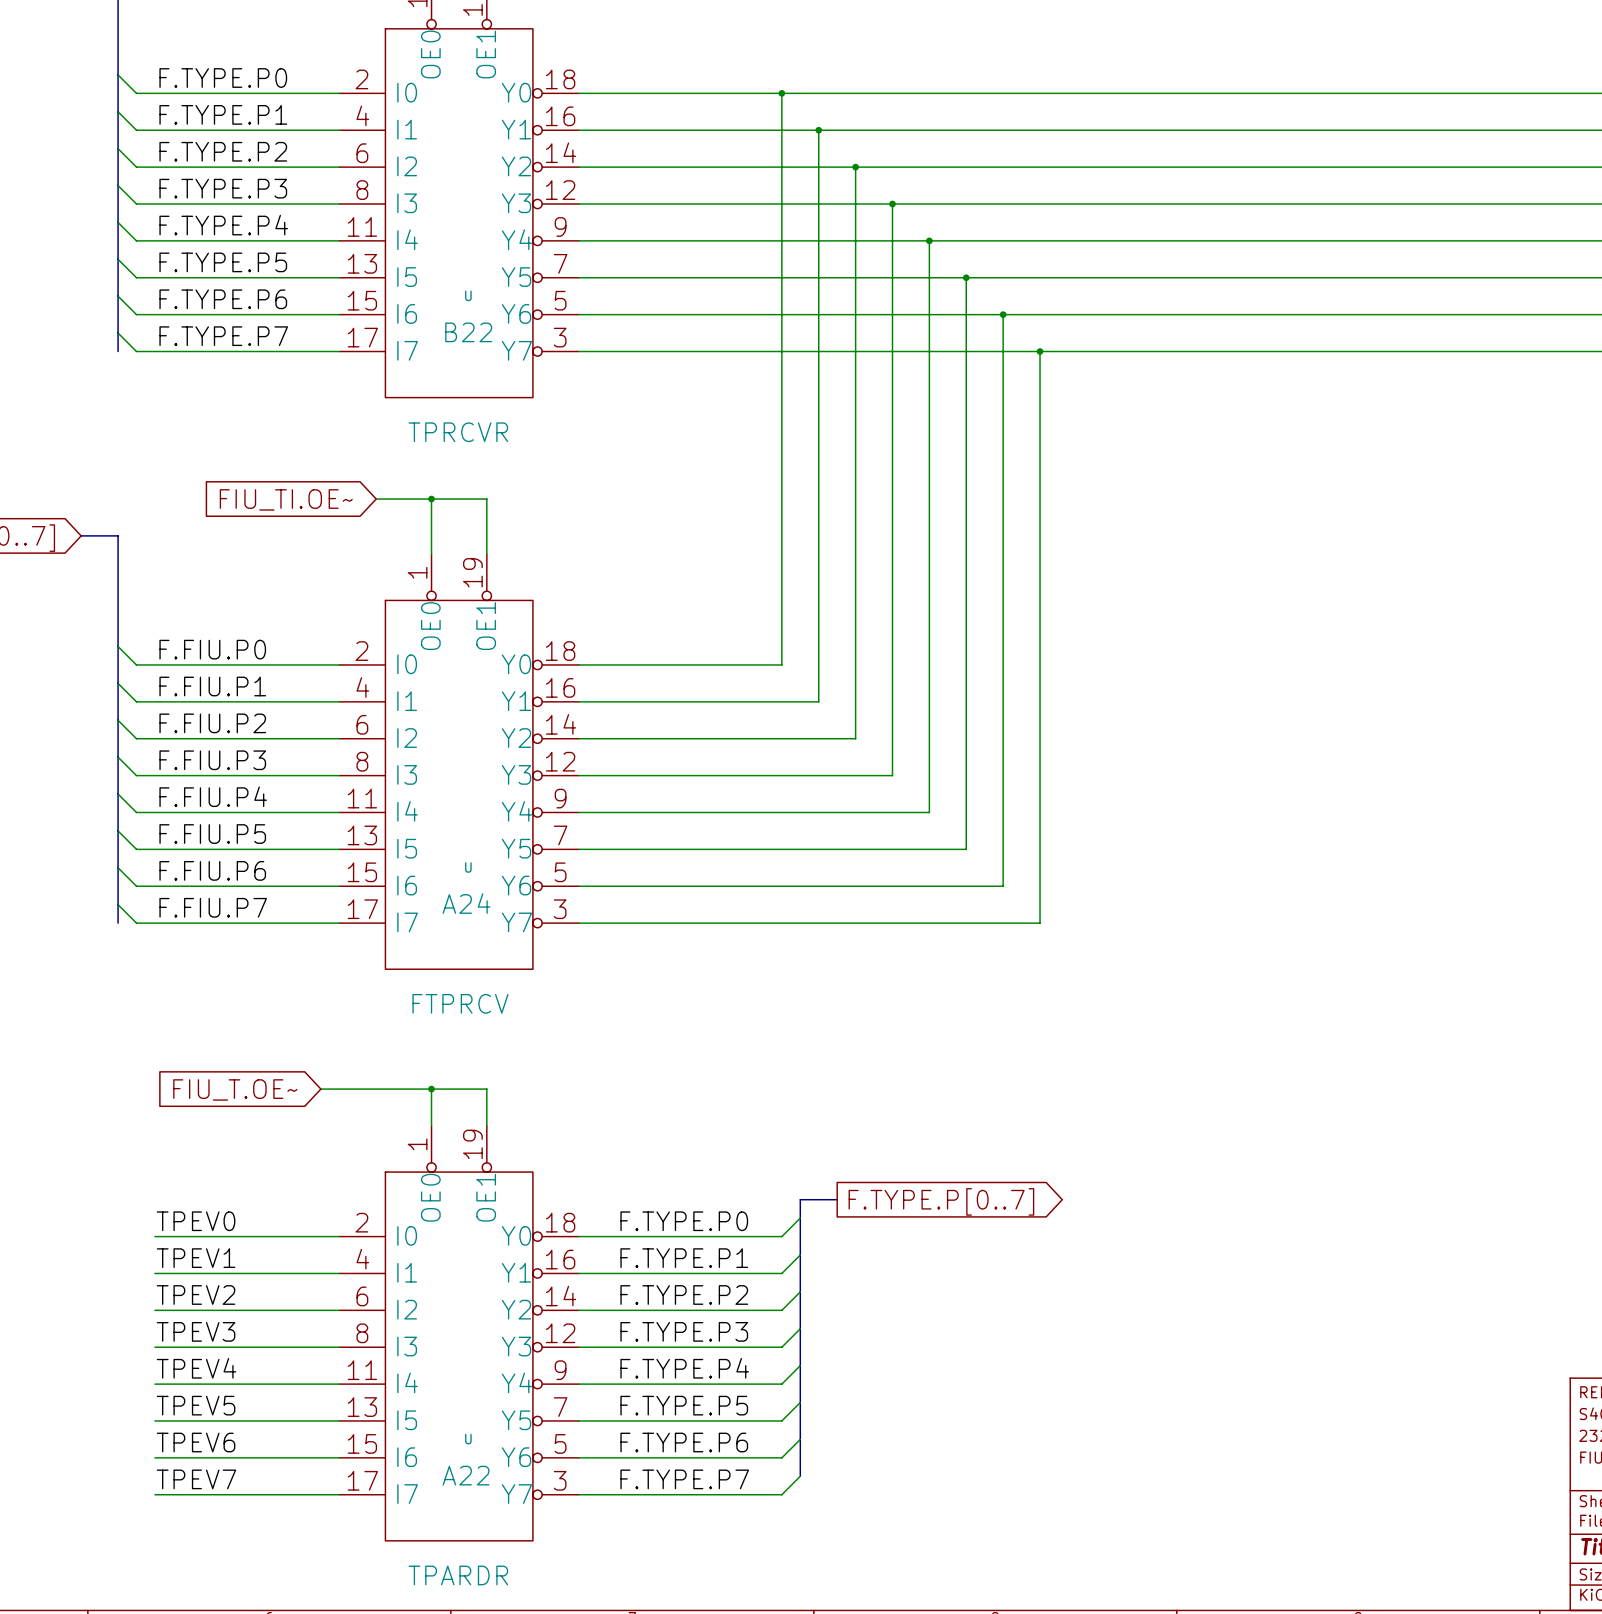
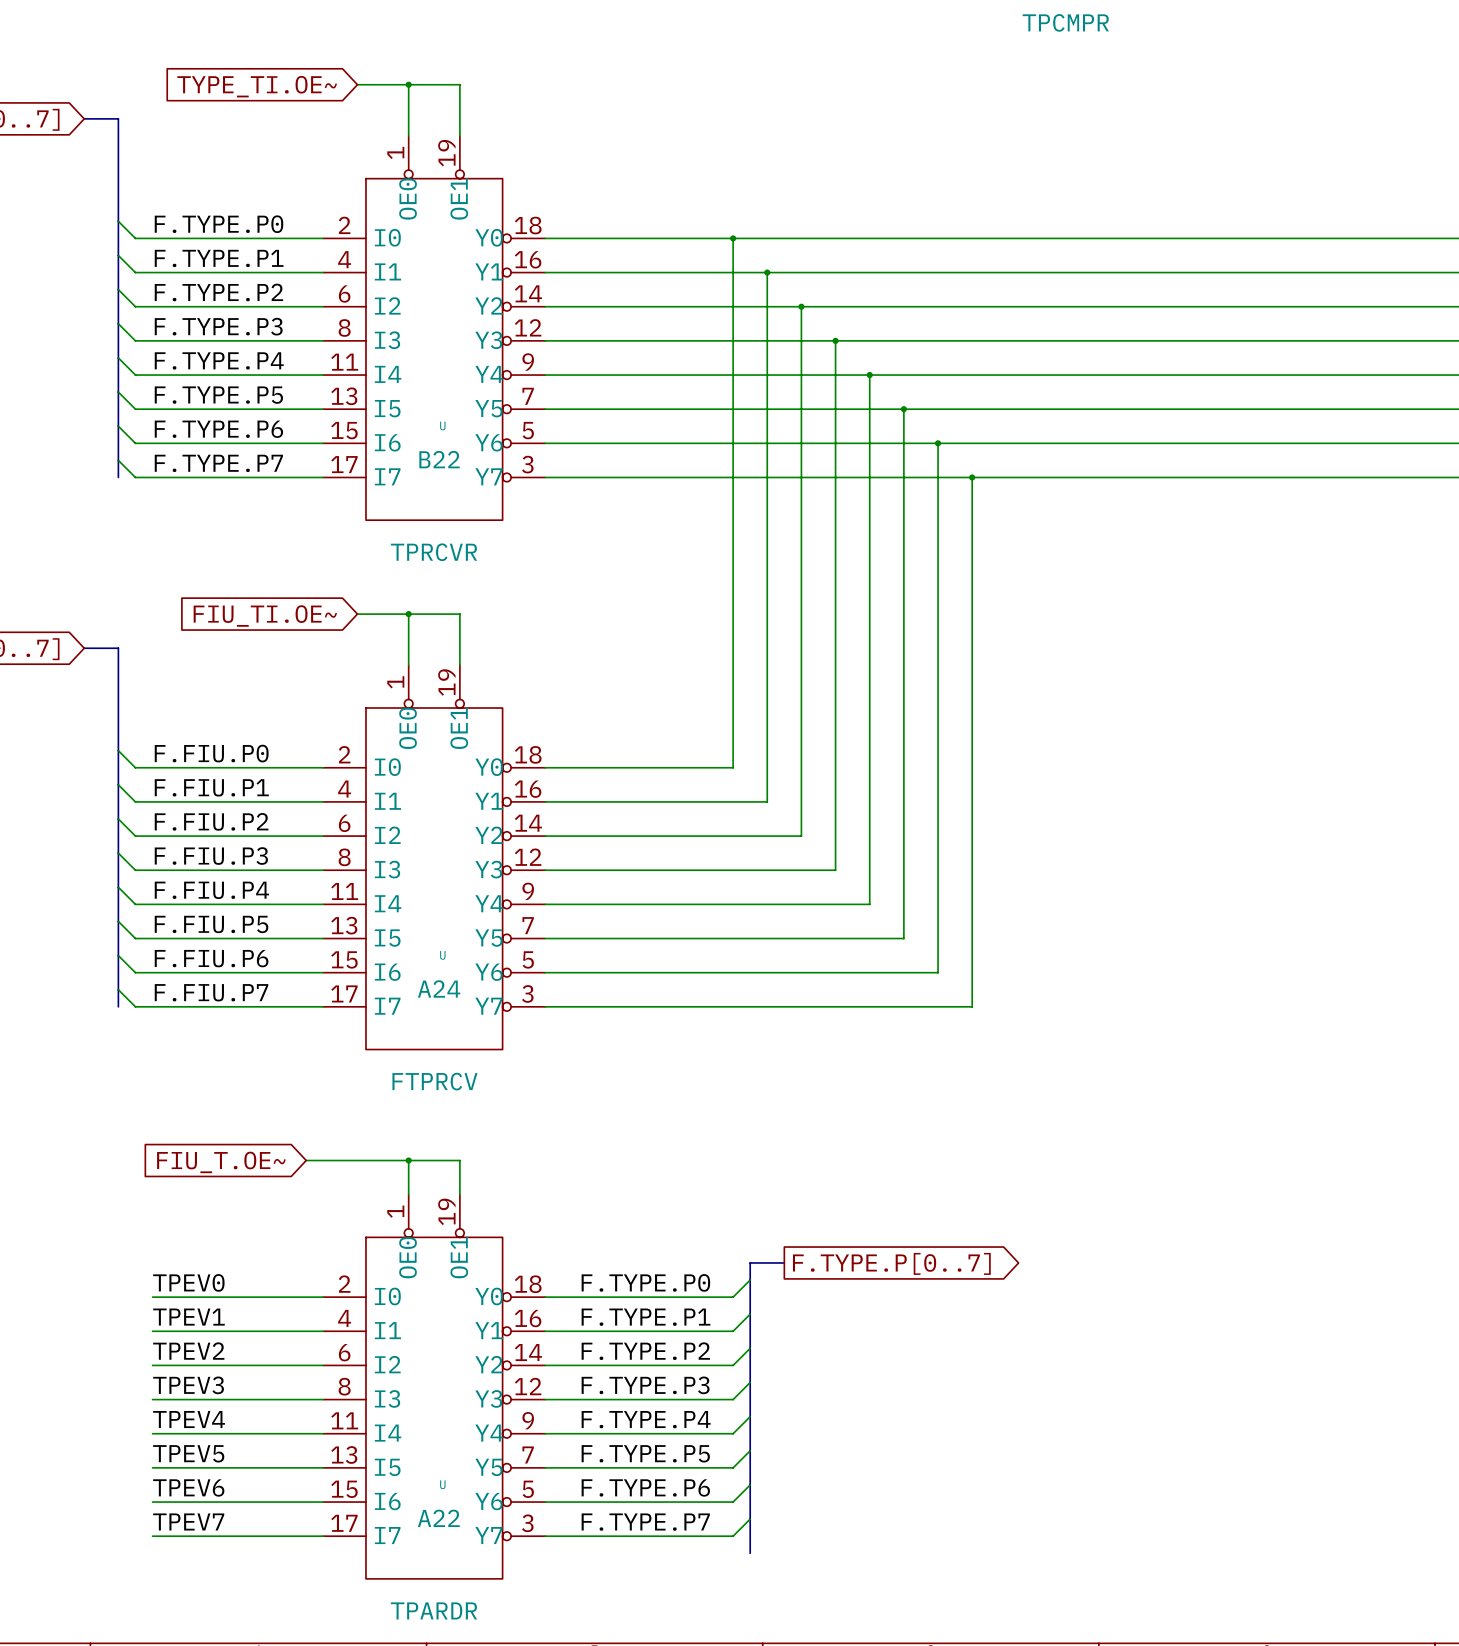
bus: none -> (750, 1519) (750, 1553)

